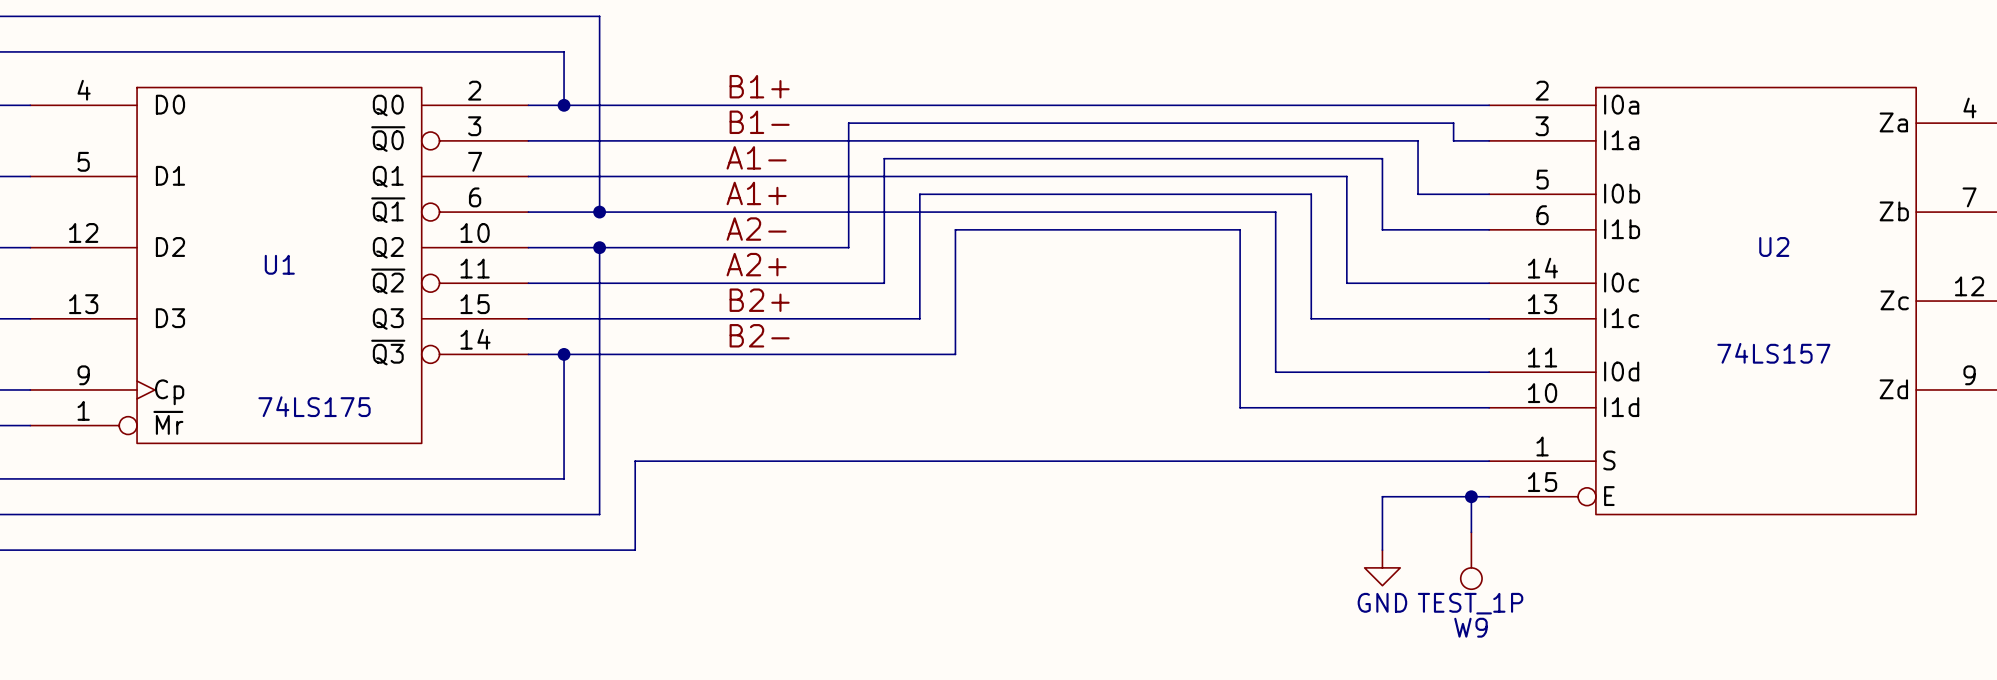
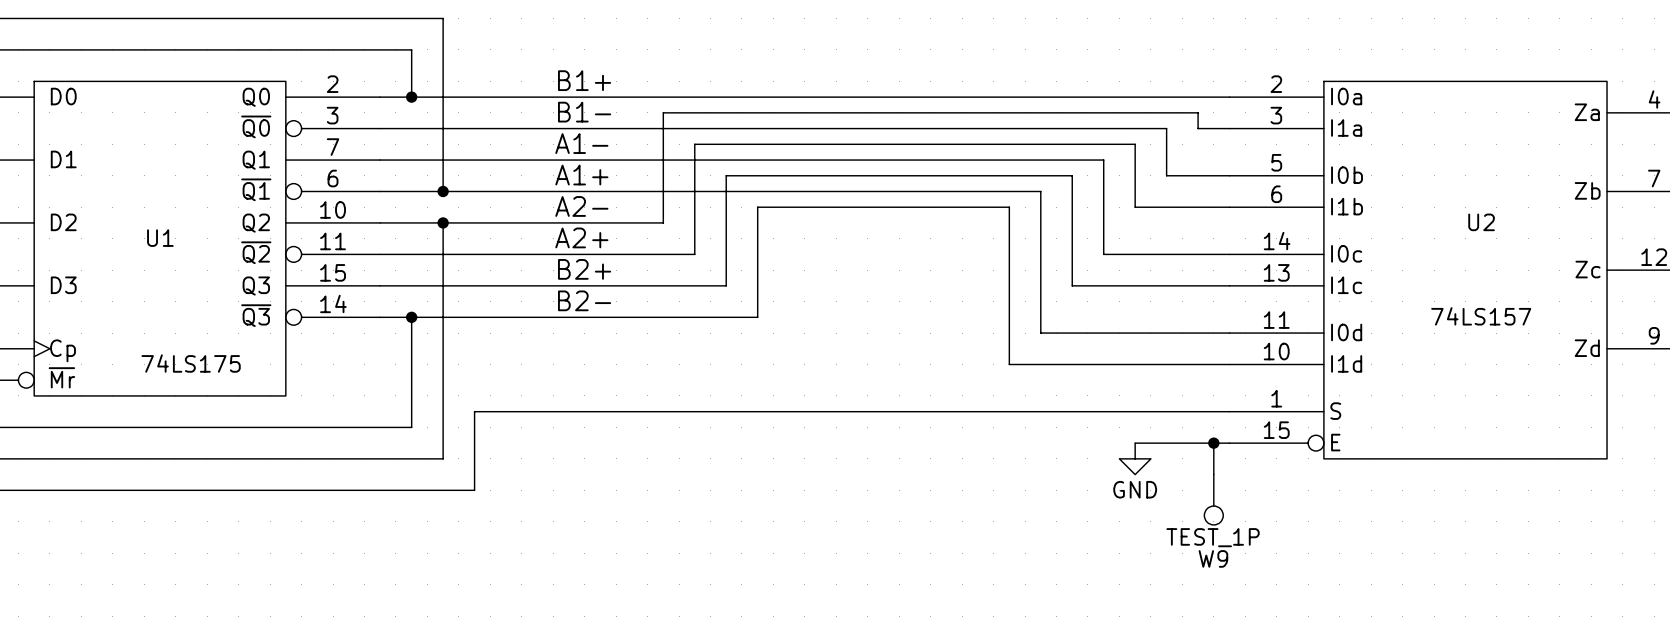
wire: (1382, 496) (1382, 550) -> none
power symbol position: GND (1382, 567) -> GND (1135, 458)

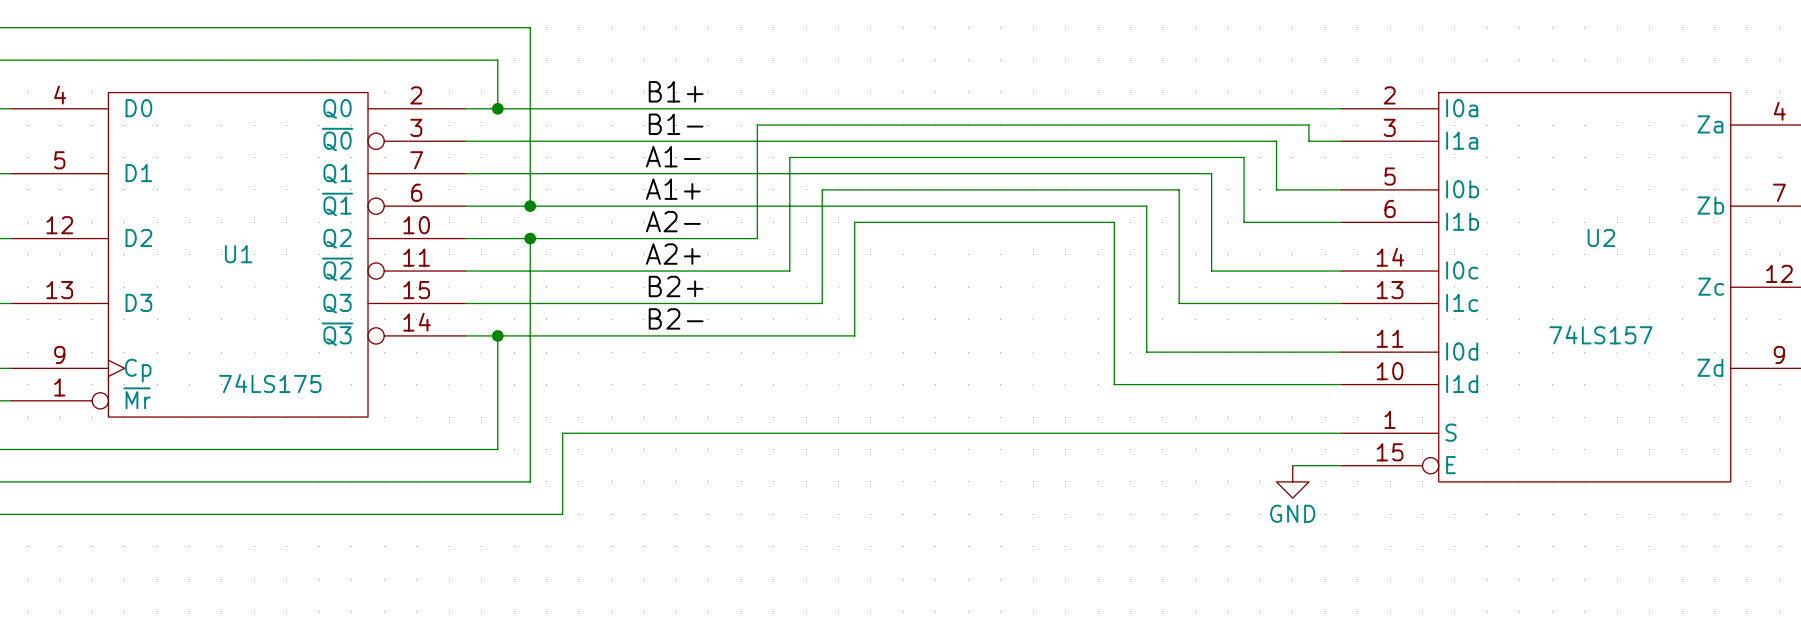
wire: (1135, 443) (1182, 443) -> none
wire: (1213, 443) (1213, 474) -> none
junction: (1213, 443) -> none
power symbol position: GND (1135, 458) -> GND (1292, 481)
W9: TEST_1P (1213, 499) -> none

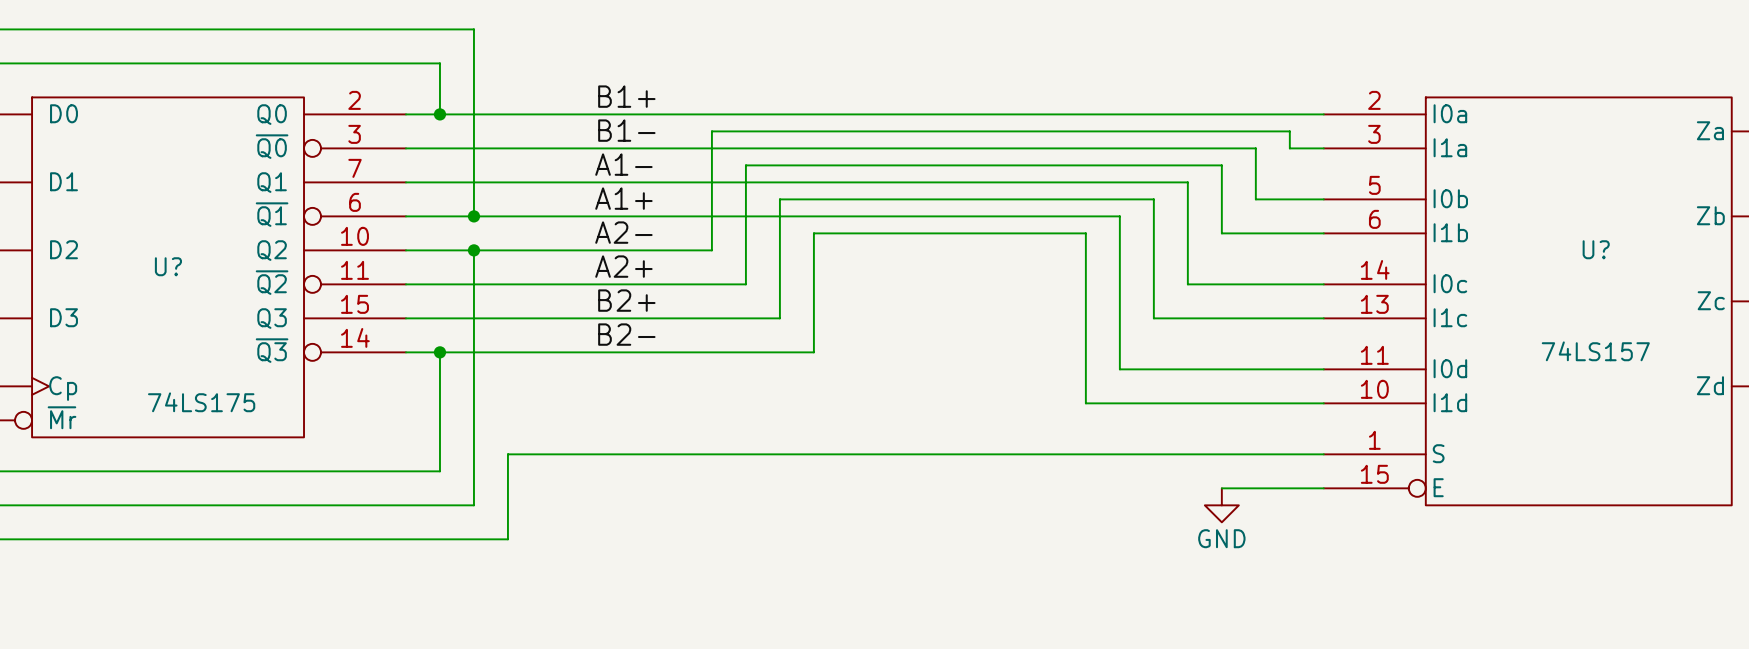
U2 name: U2 (1601, 237) -> U? (1596, 249)
U1 name: U1 (238, 254) -> U? (168, 266)
wire: none -> (1221, 488) (1272, 488)
power symbol position: GND (1292, 481) -> GND (1221, 505)

